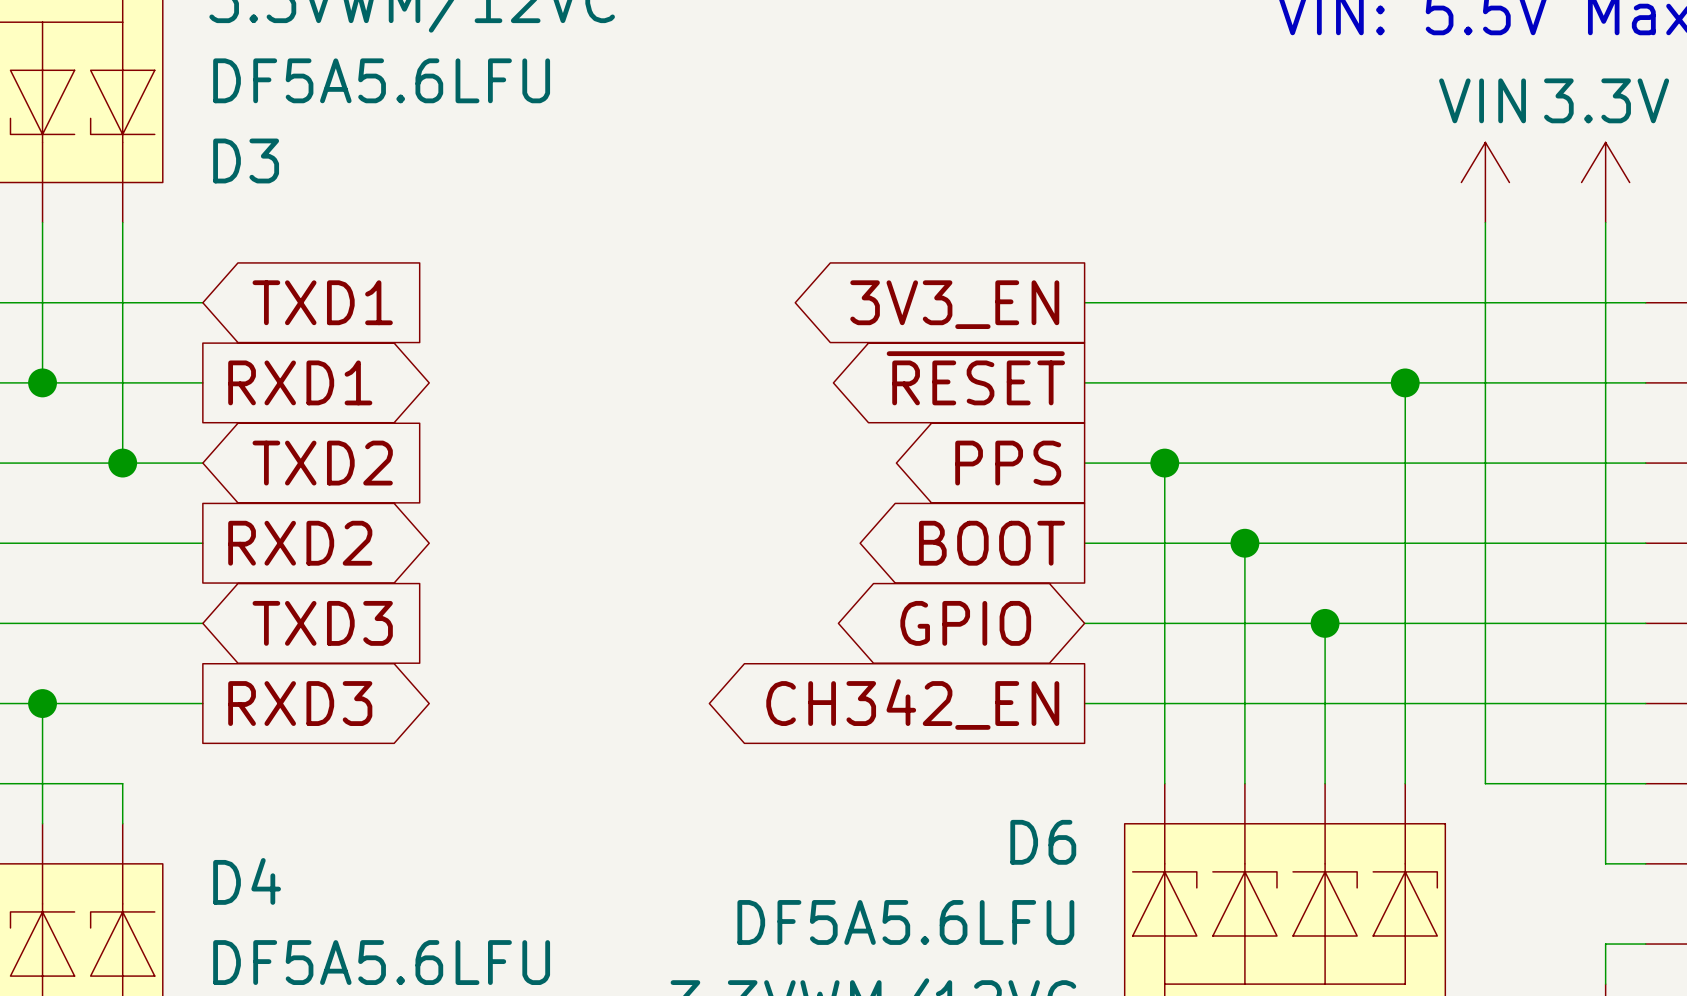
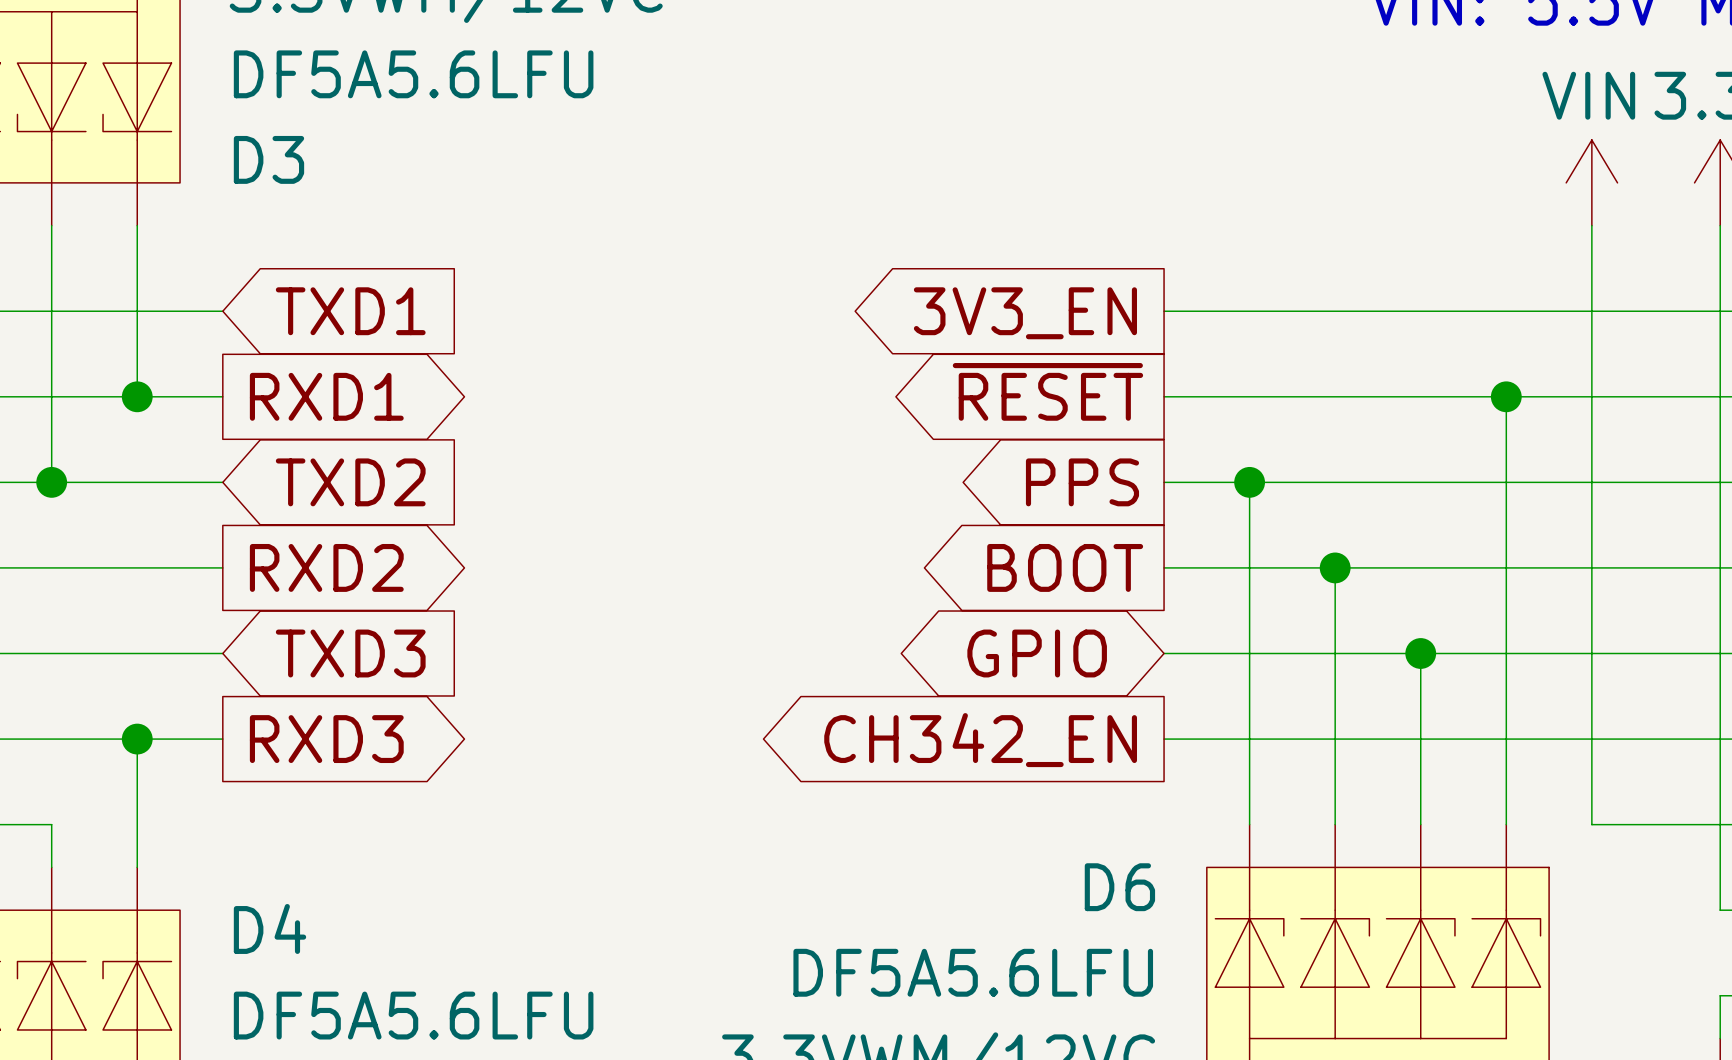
junction: (42, 382) -> none
wire: (122, 382) (122, 463) -> (51, 396) (51, 482)
junction: none -> (137, 396)
junction: none -> (51, 482)
junction: (122, 463) -> none
wire: (42, 703) (42, 783) (122, 783) -> (137, 739) (137, 824)
junction position: (42, 703) -> (137, 739)

